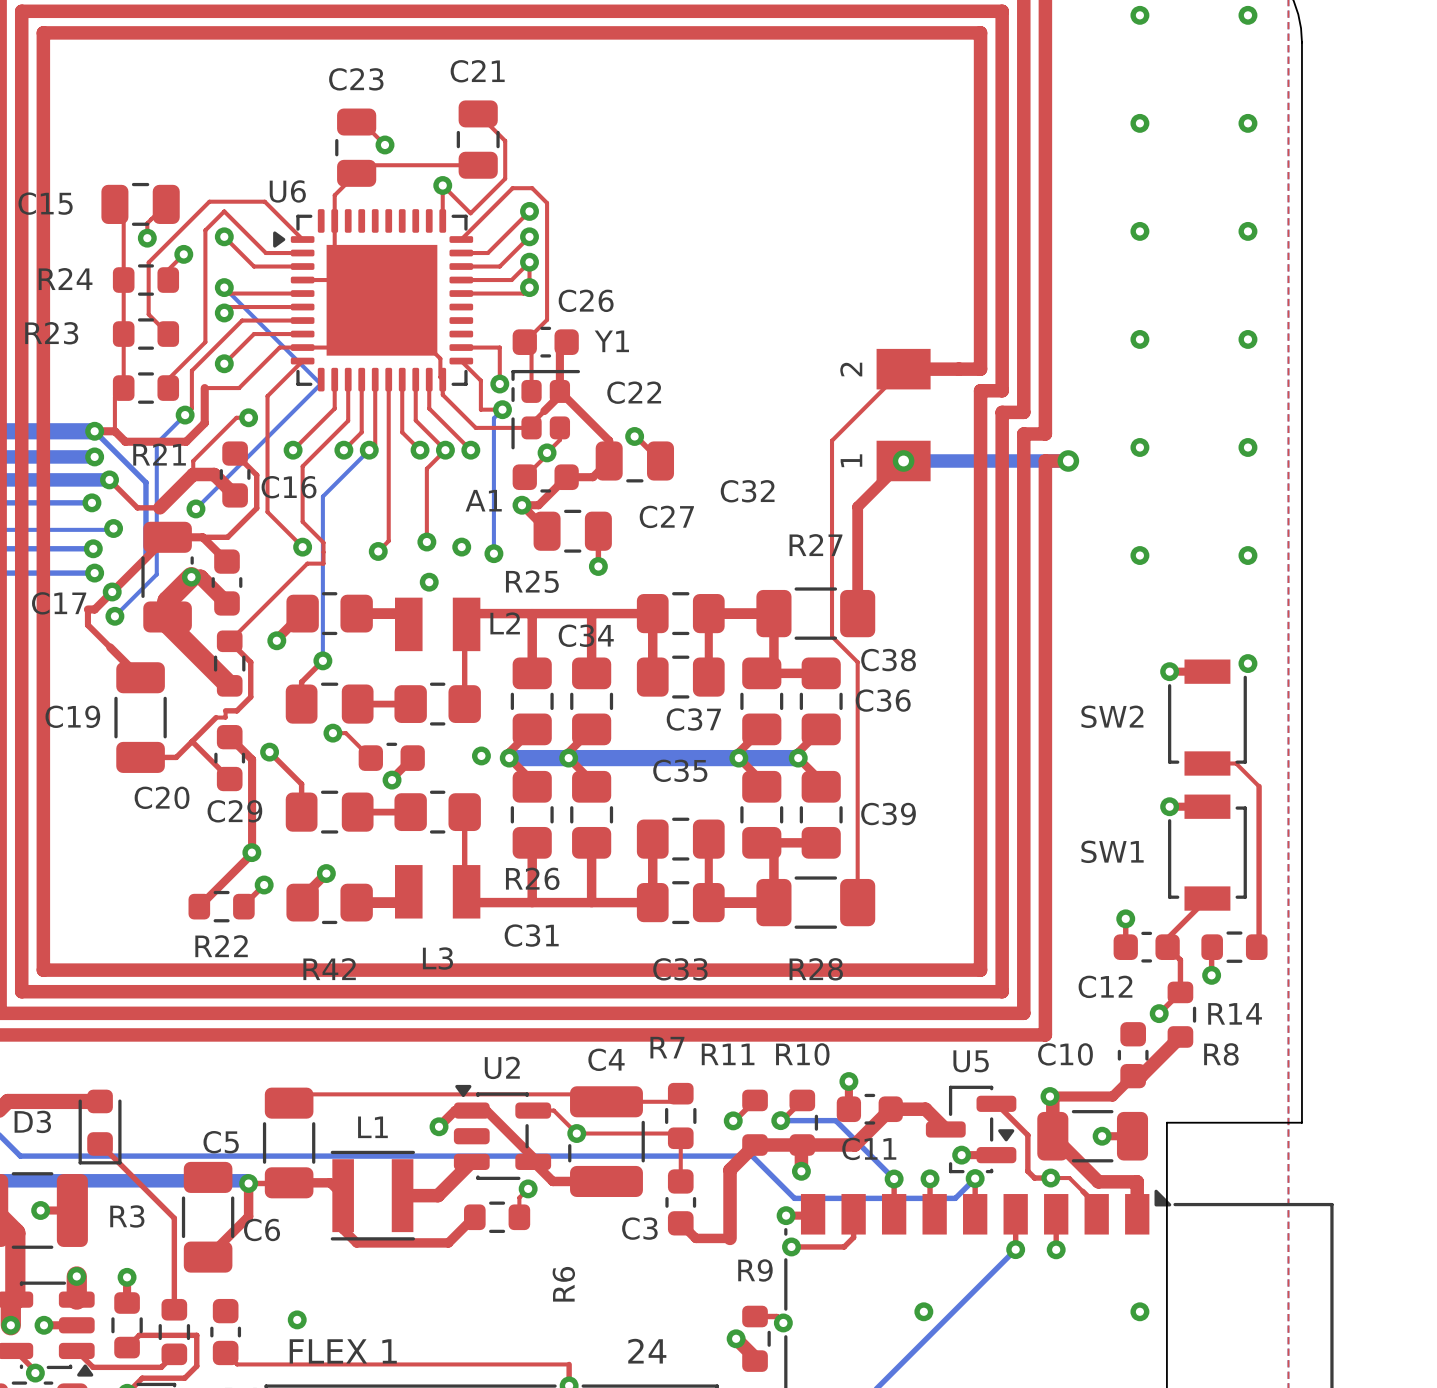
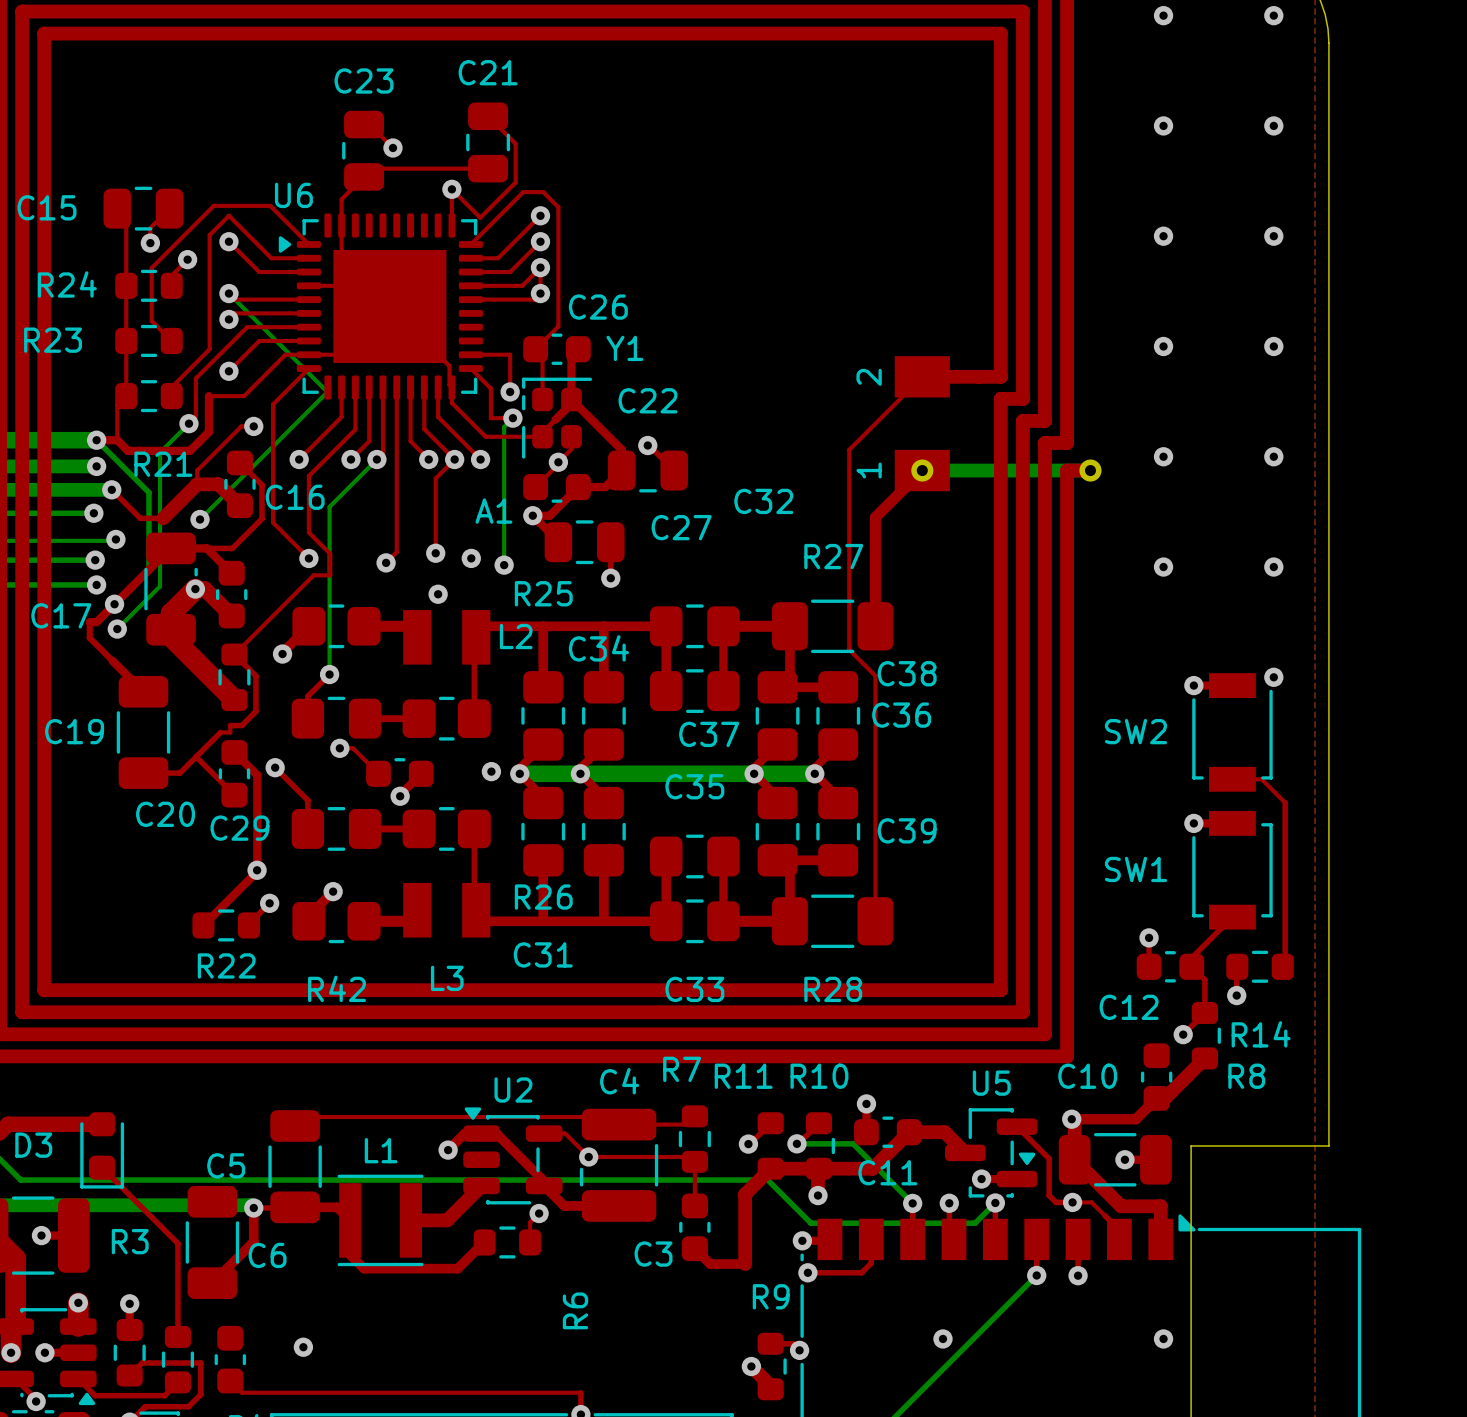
text: FLEX 1 (343, 1351) -> none
text: 24 (647, 1351) -> none

